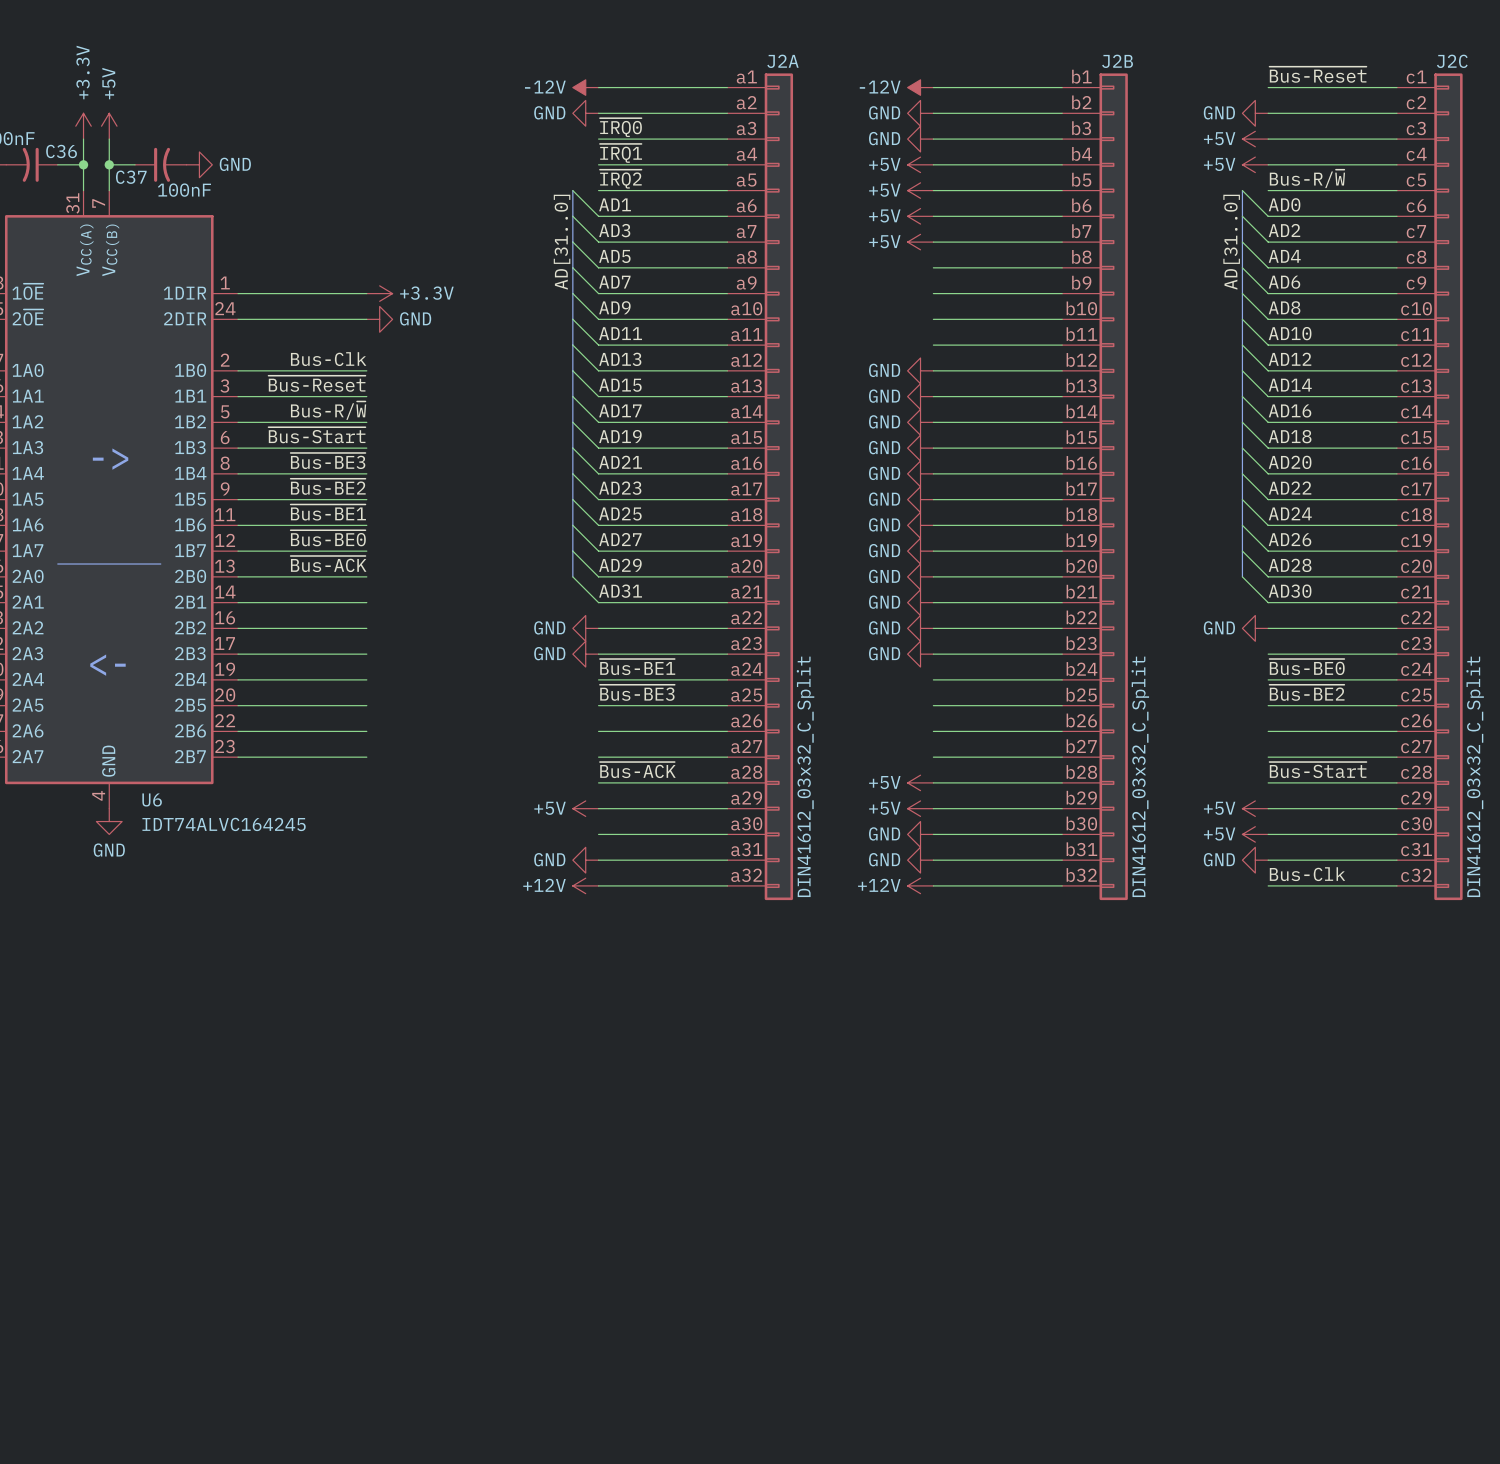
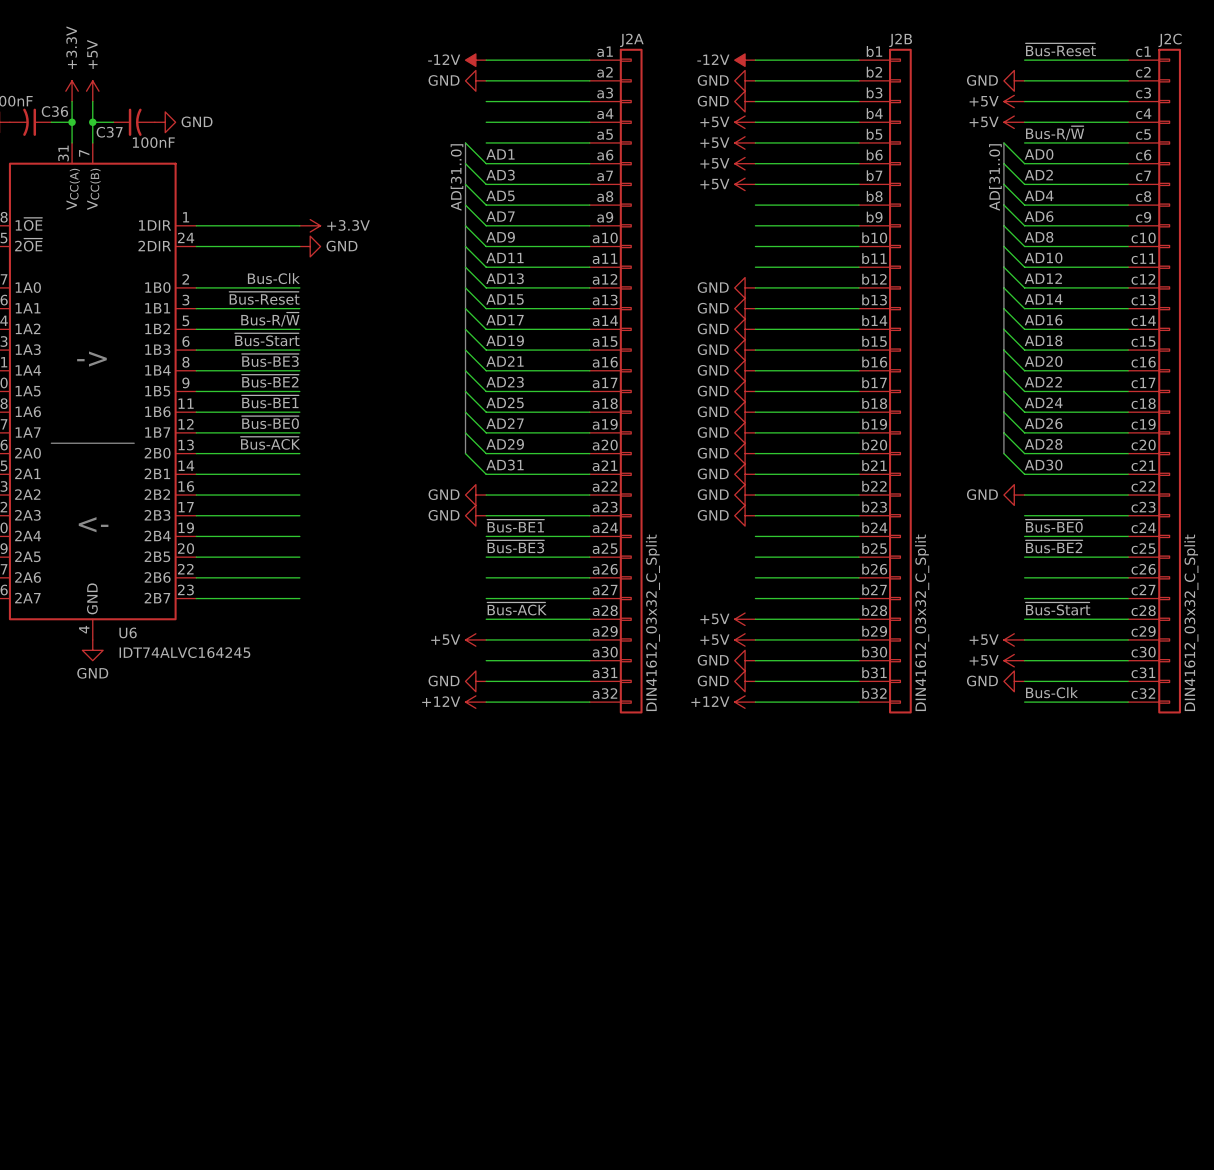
label: ~{IRQ0} (620, 127) -> none
label: ~{IRQ1} (620, 153) -> none
label: ~{IRQ2} (620, 179) -> none

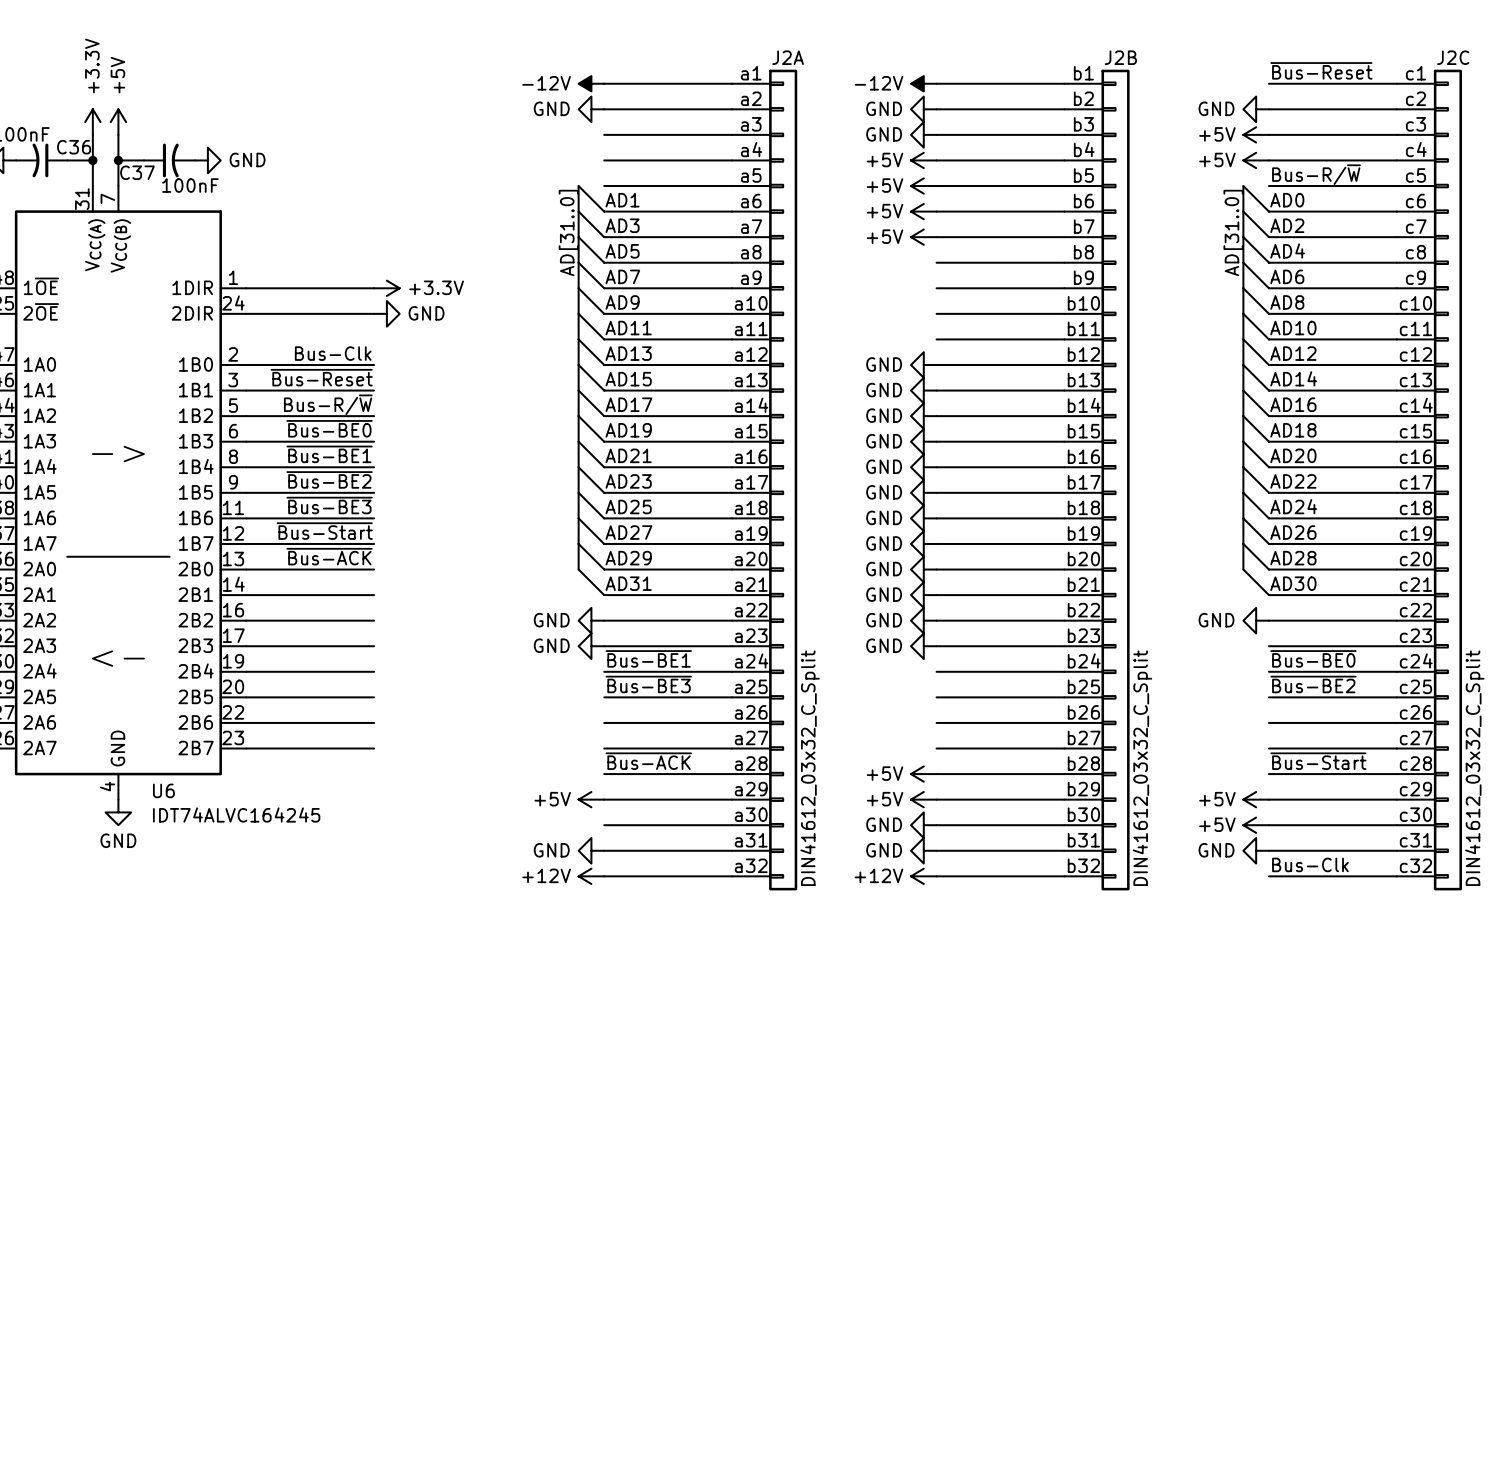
label: ~{Bus-Start} (267, 339) -> ~{Bus-BE0} (329, 428)
label: ~{Bus-BE3} (270, 360) -> ~{Bus-BE1} (329, 454)
label: ~{Bus-BE1} (270, 401) -> ~{Bus-BE3} (329, 505)
label: ~{Bus-BE0} (270, 422) -> ~{Bus-Start} (324, 531)

